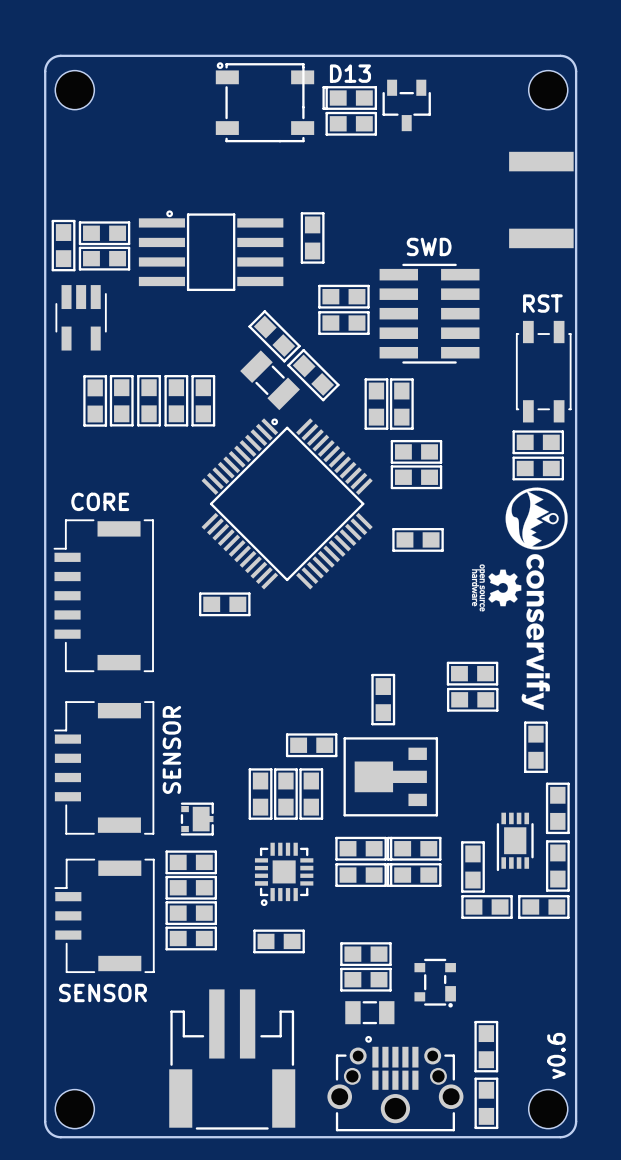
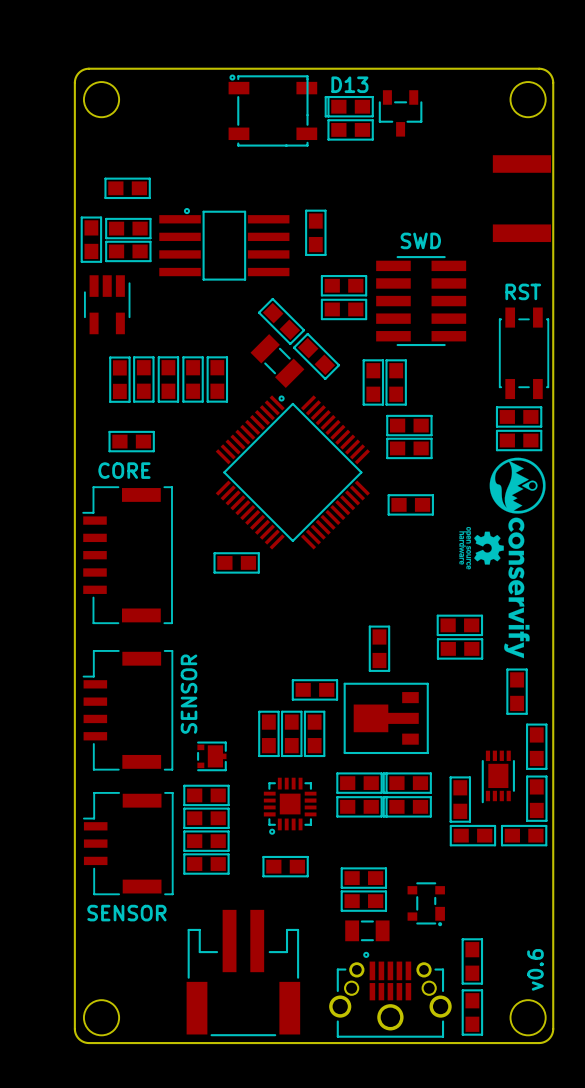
part: none -> (127, 188)
part: none -> (131, 441)

